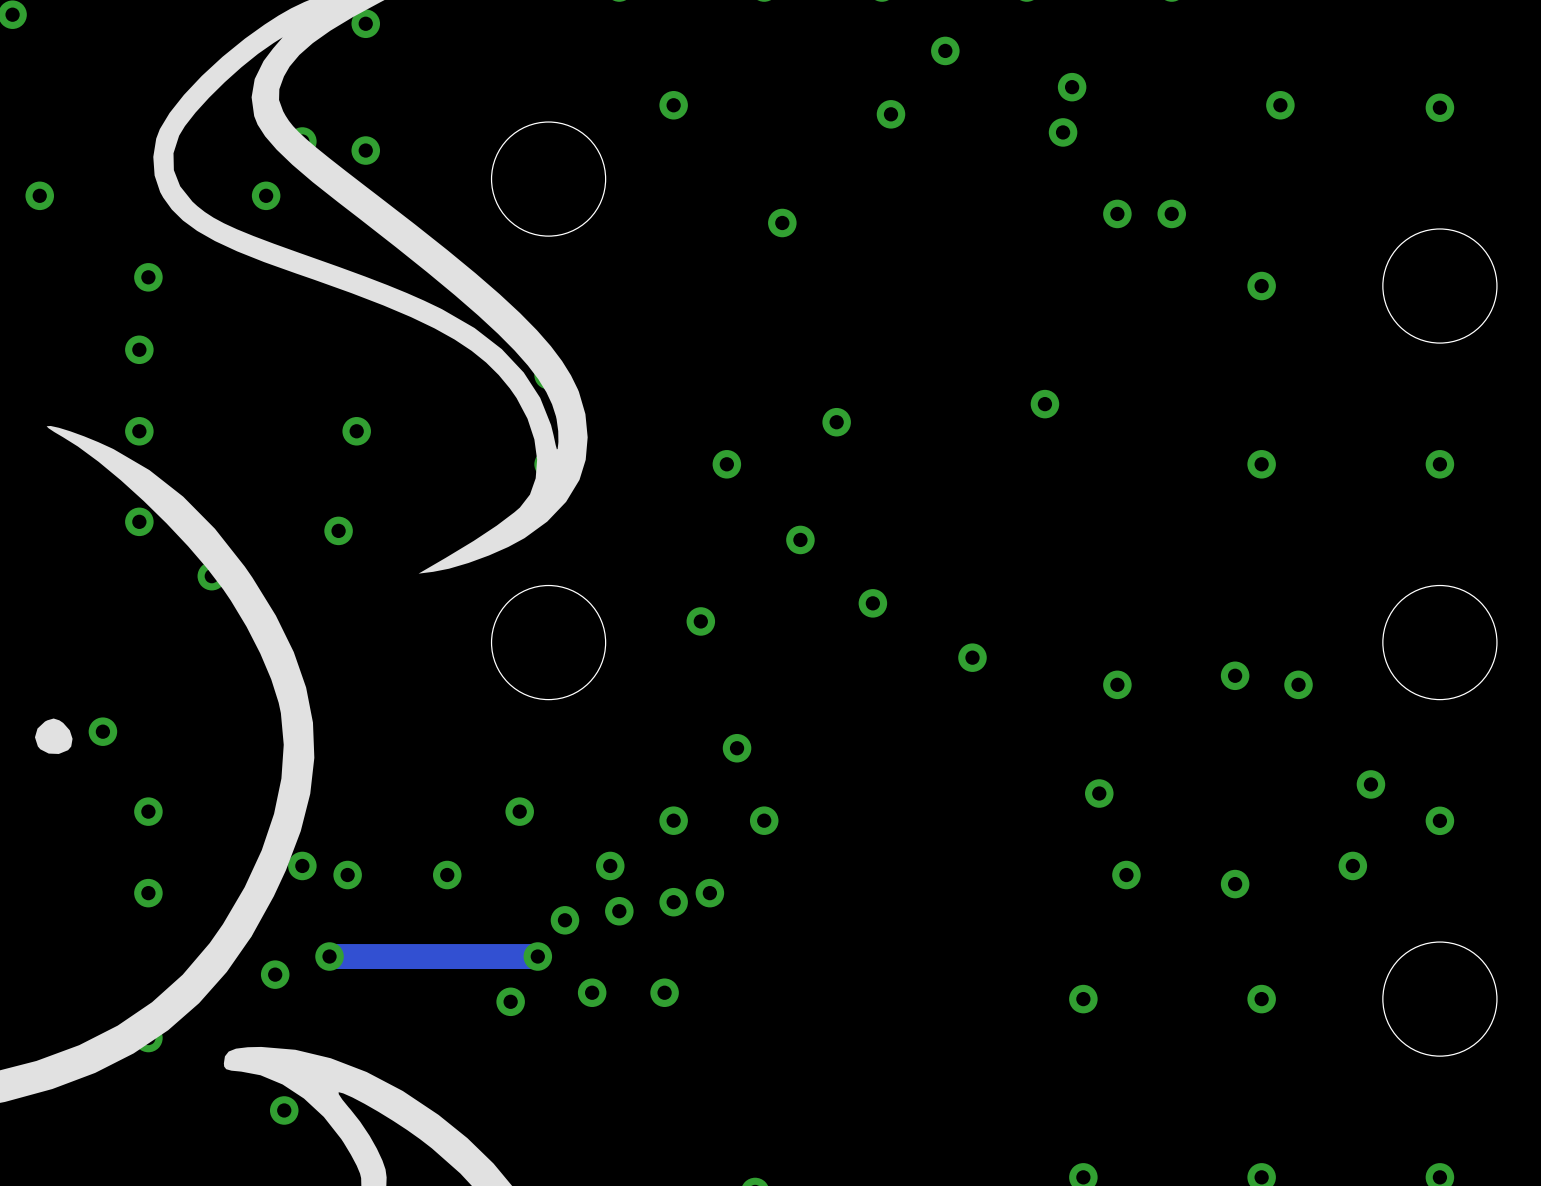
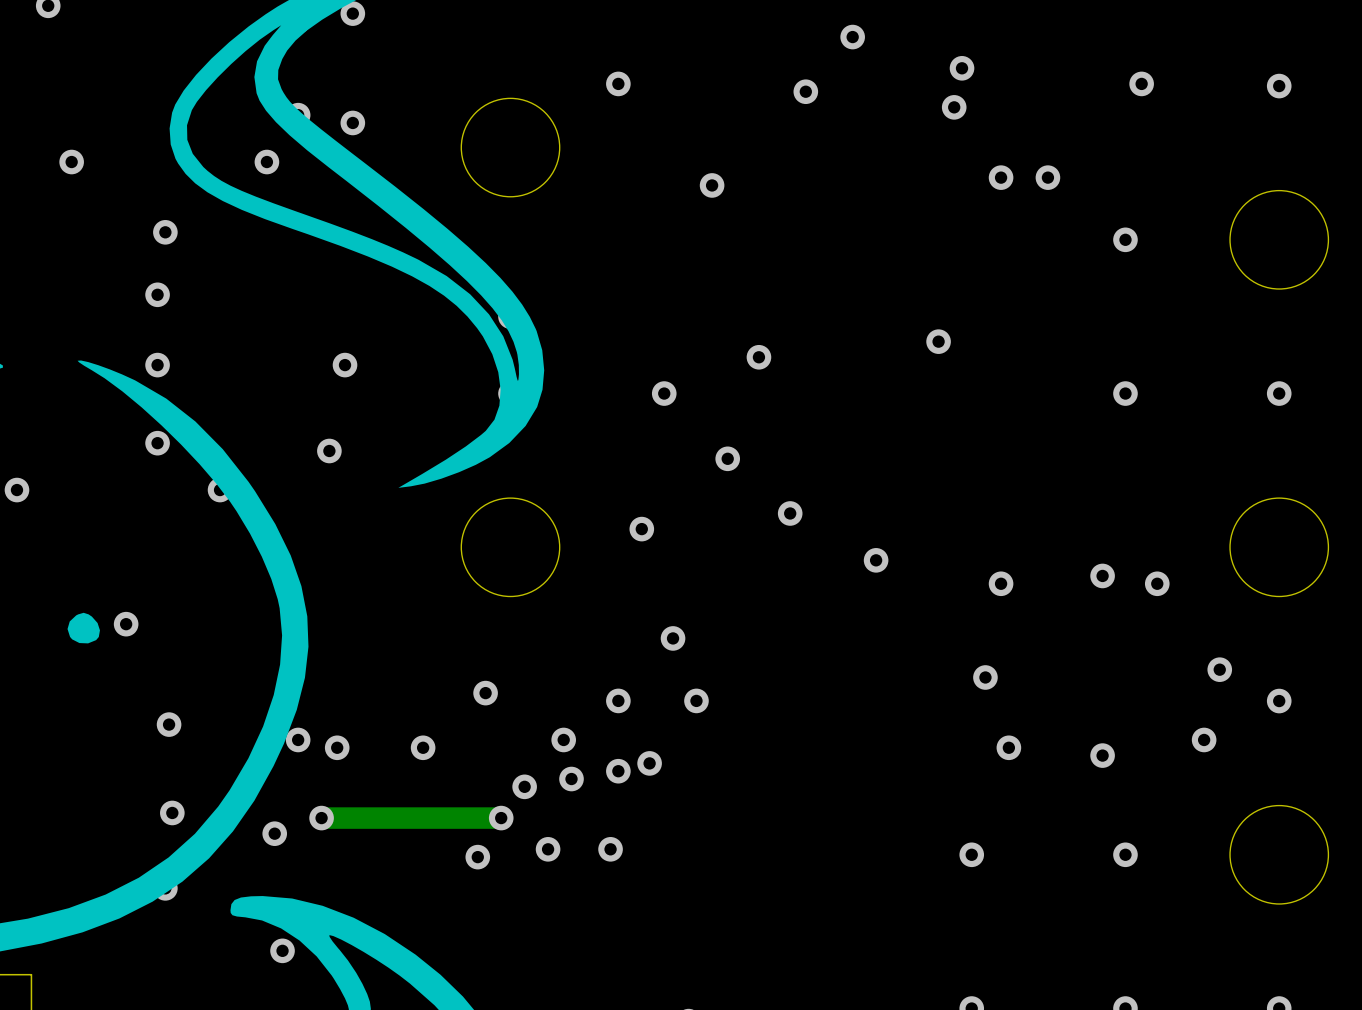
via: (148, 811) -> none
via: none -> (169, 724)
via: (148, 893) -> none
via: none -> (172, 812)

